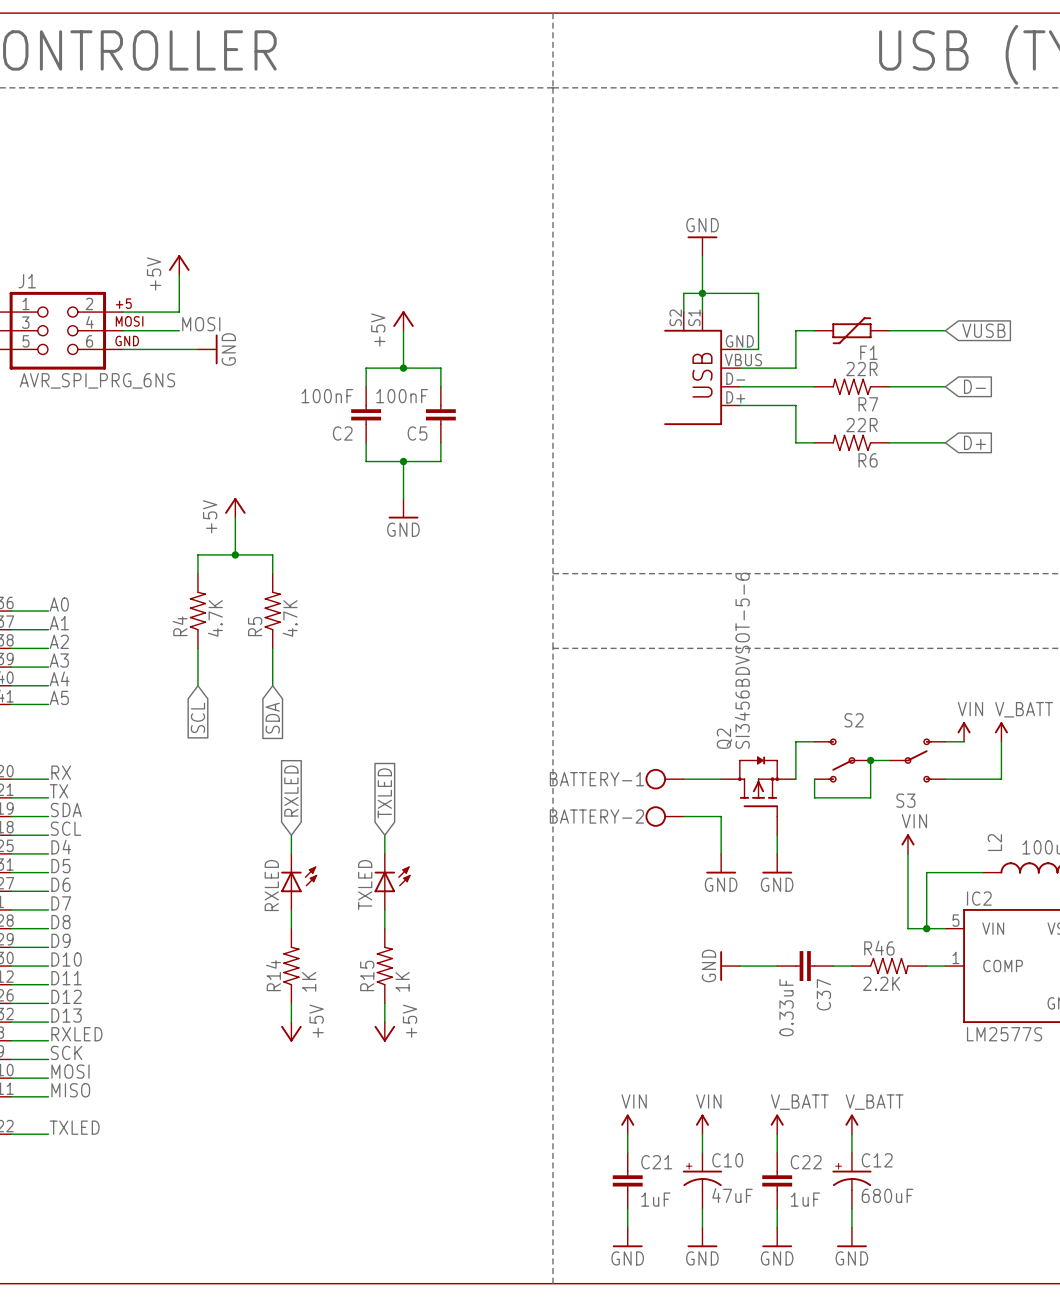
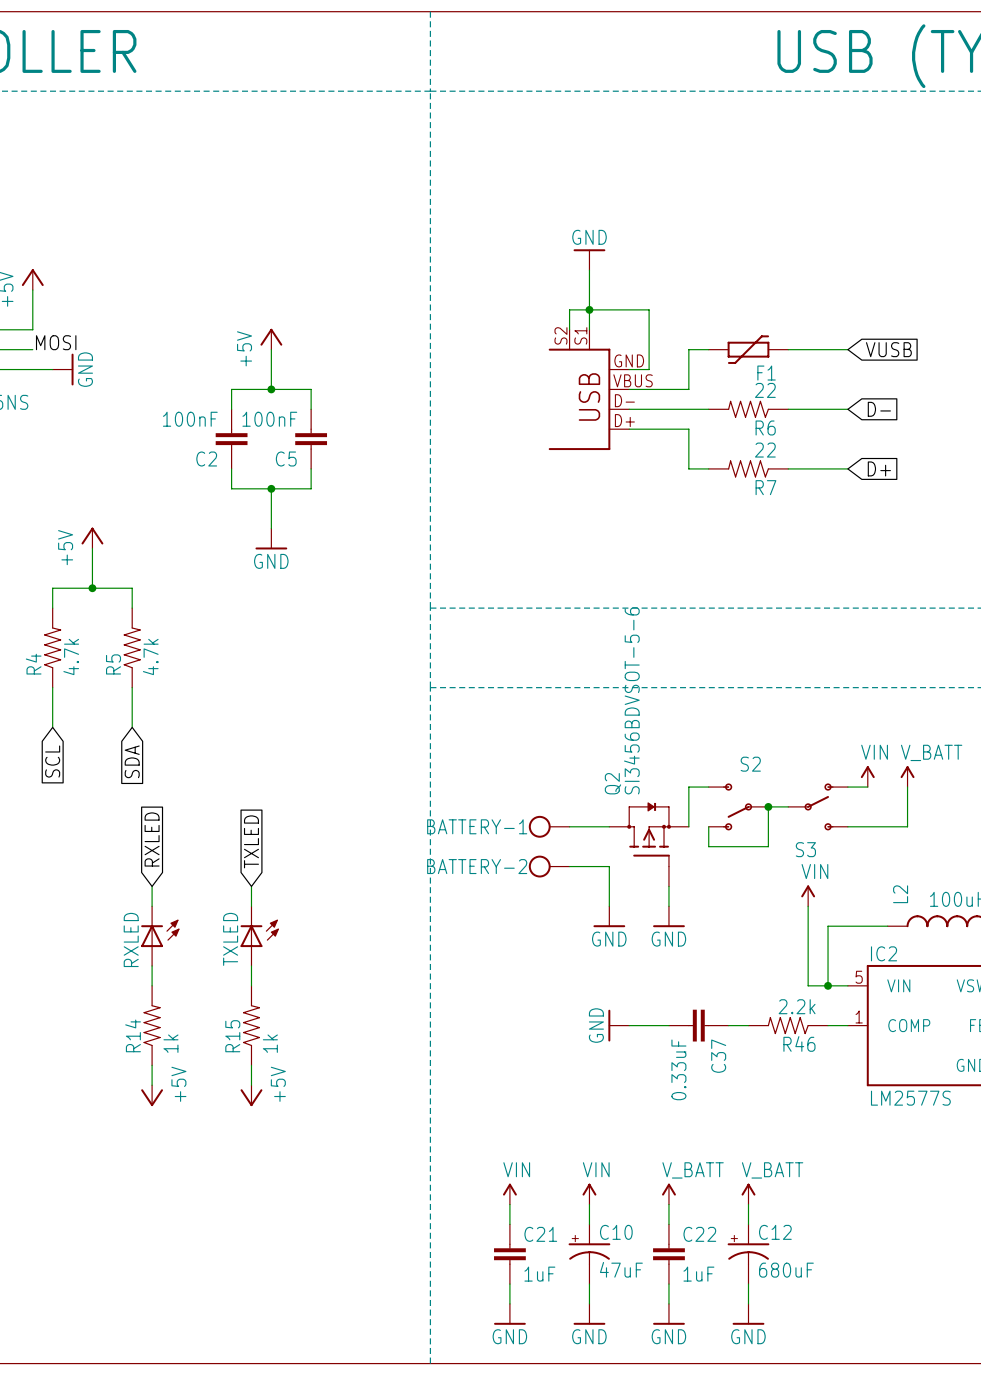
R7 value: 22R (861, 369) -> 22 (765, 390)
R7 name: R7 (868, 404) -> R6 (765, 427)
R6 value: 22R (861, 425) -> 22 (765, 450)
R6 name: R6 (868, 460) -> R7 (765, 487)
R4 value: 4.7K (215, 618) -> 4.7k (71, 656)
R5 value: 4.7K (290, 618) -> 4.7k (150, 656)
R46 rotation: 0° (889, 966) -> 180° (788, 1025)
R14 value: 1K (309, 981) -> 1k (170, 1043)
R15 value: 1K (402, 981) -> 1k (270, 1043)
R46 value: 2.2K (881, 983) -> 2.2k (797, 1006)

